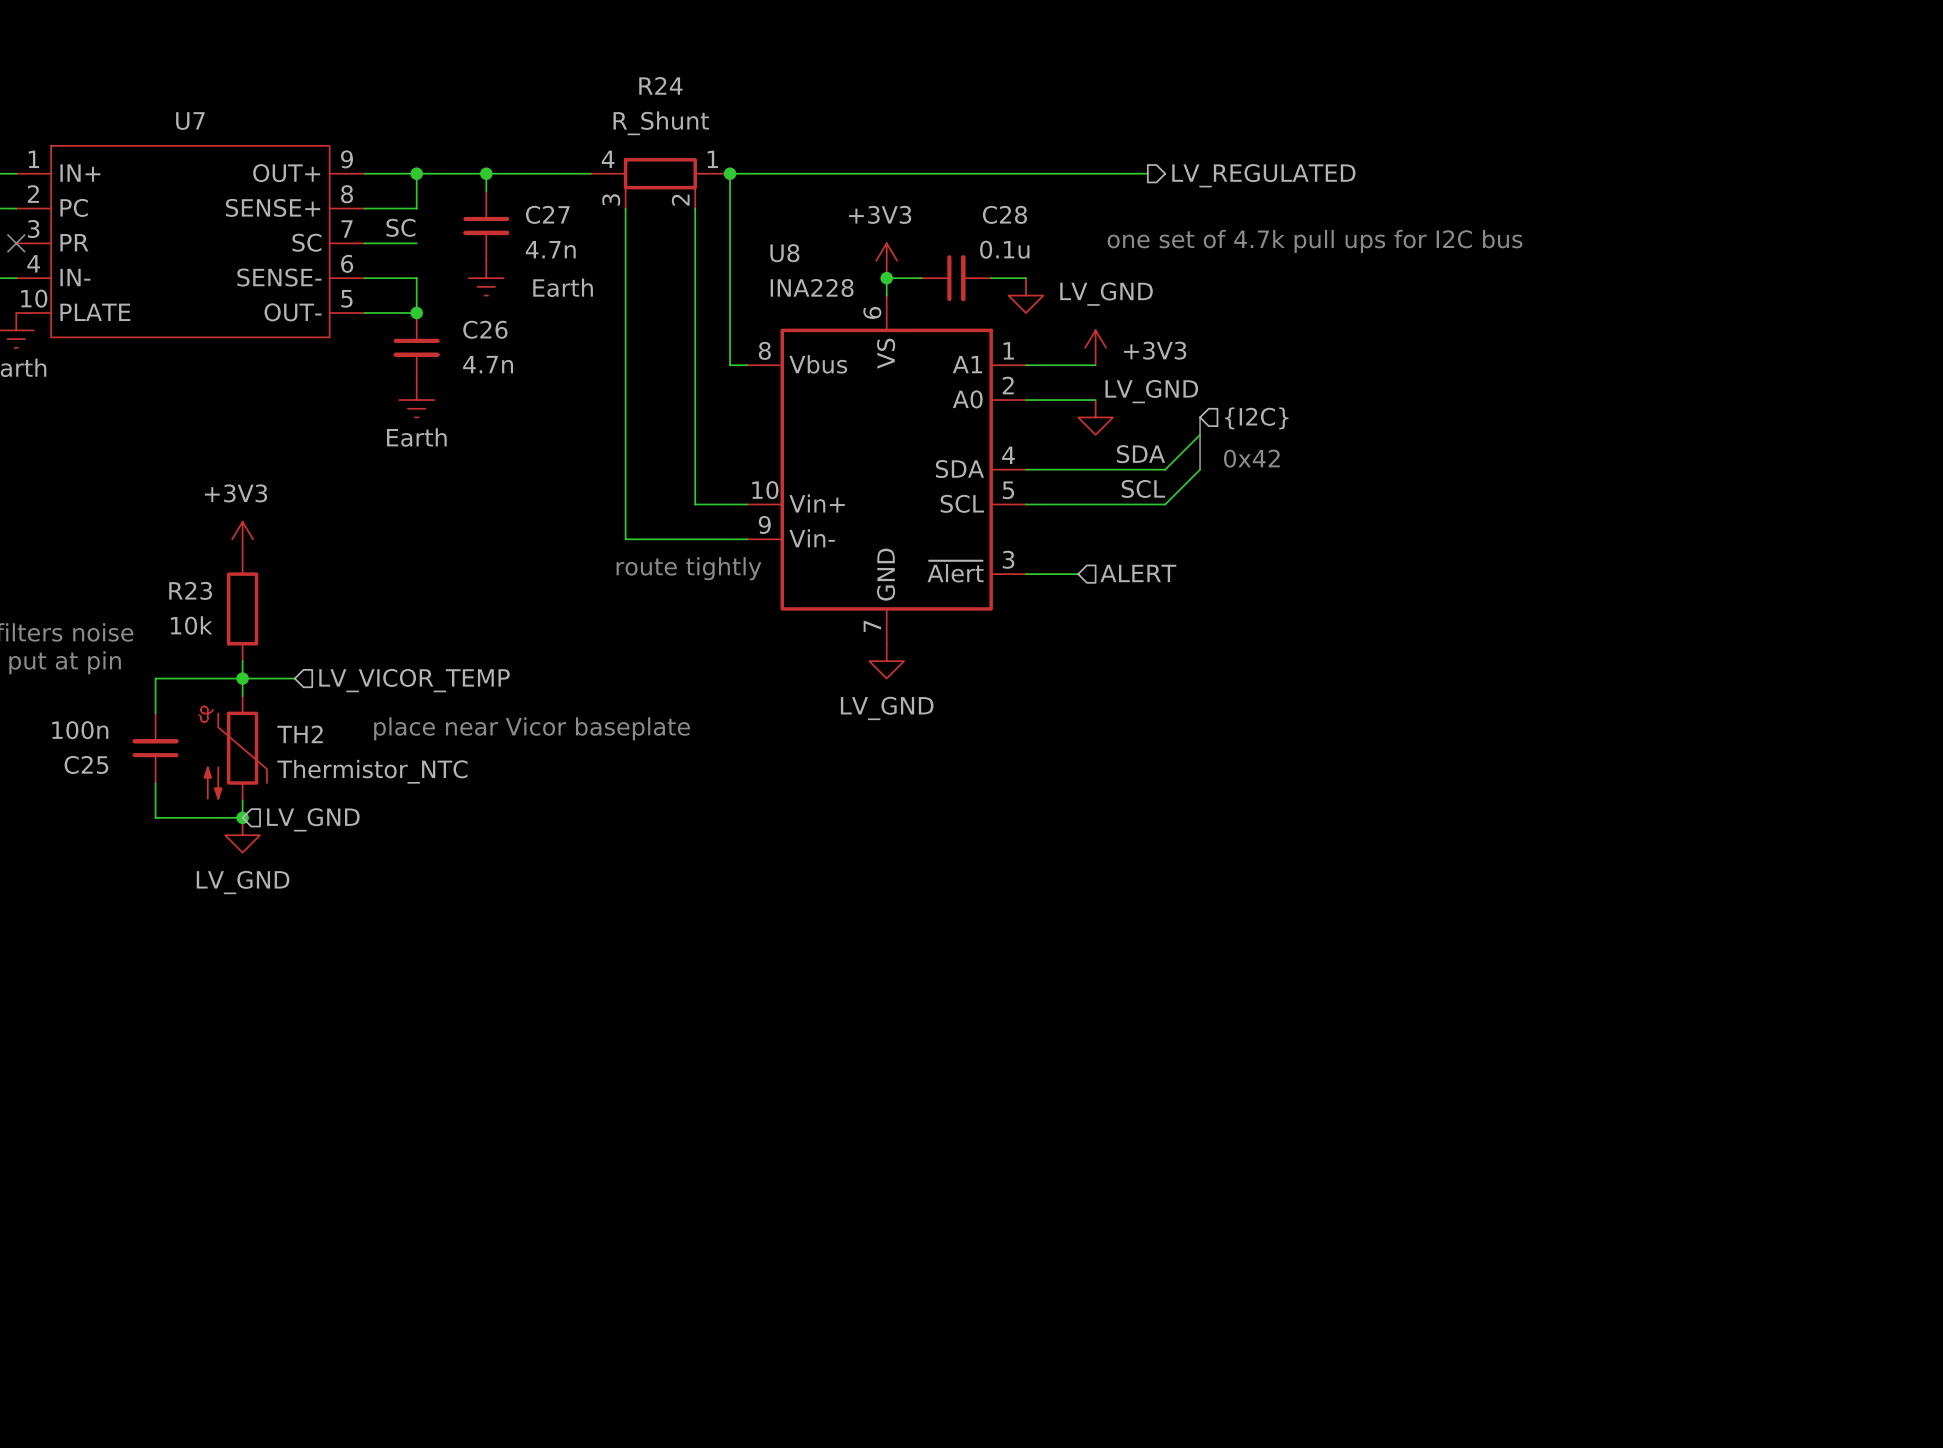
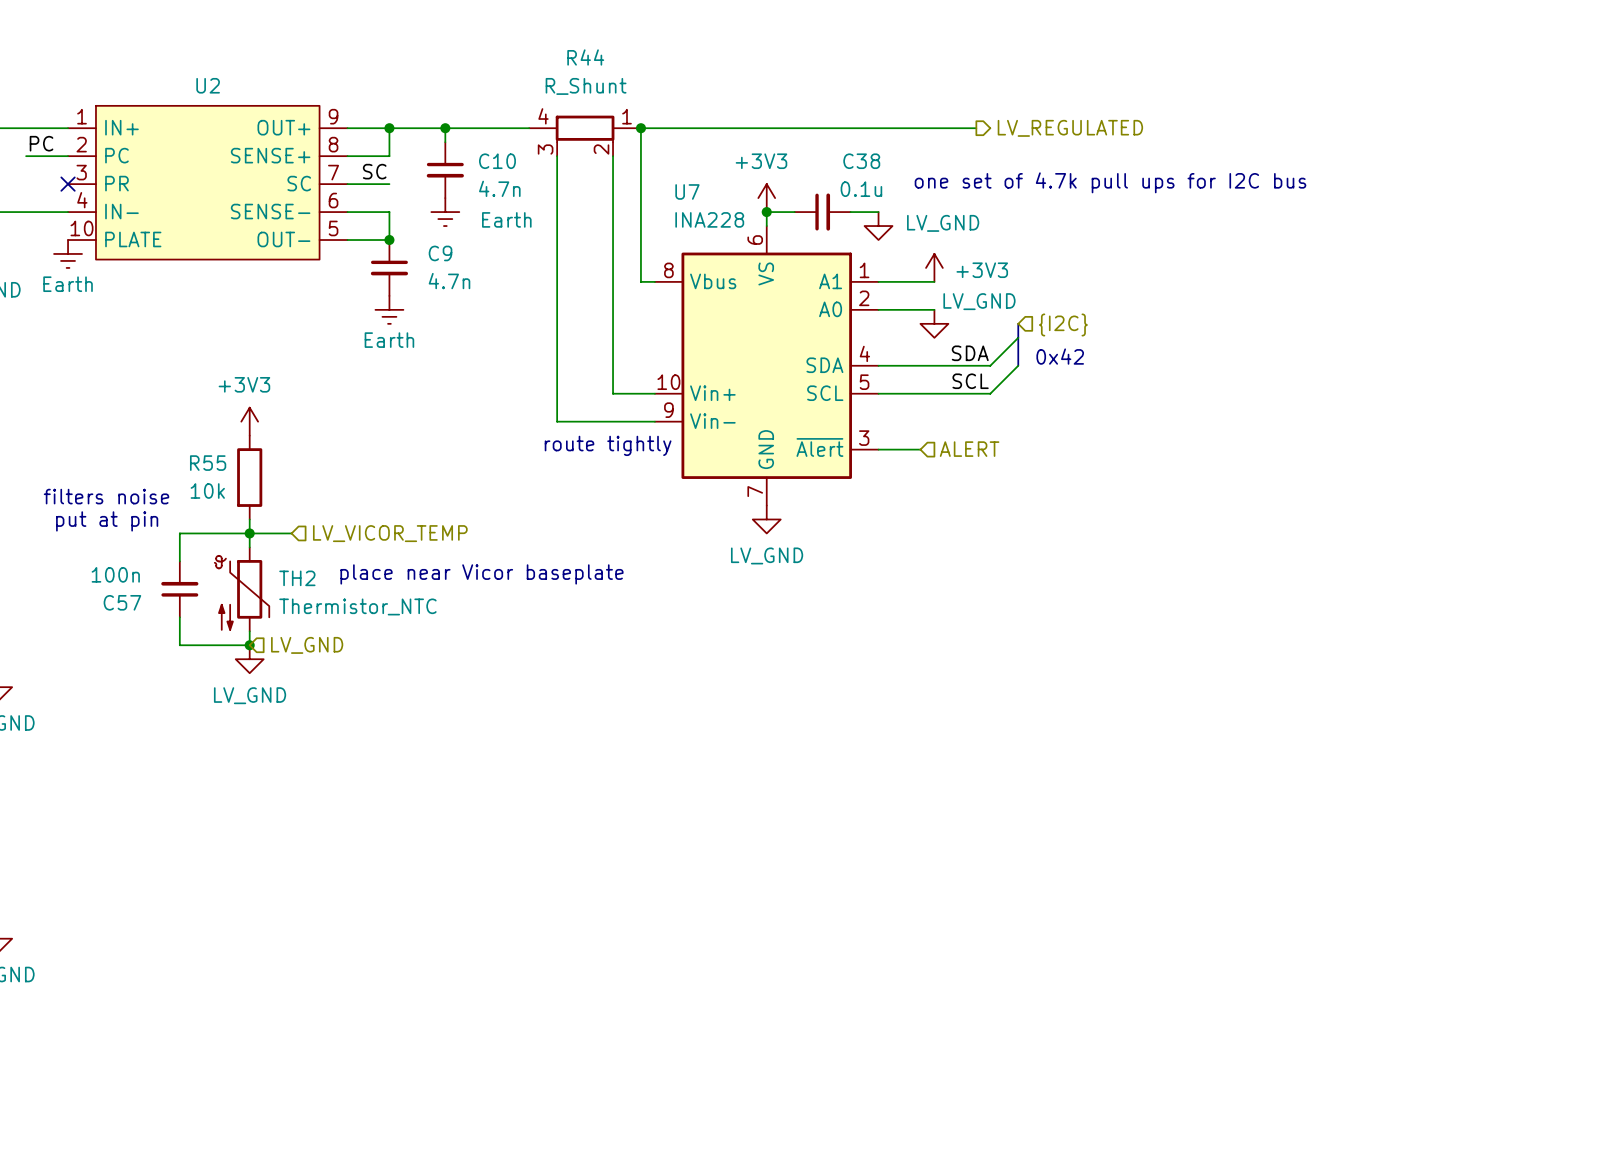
R24 name: R24 (660, 85) -> R44 (585, 57)
U7 name: U7 (190, 121) -> U2 (208, 85)
C27 name: C27 (547, 214) -> C10 (497, 161)
C28 name: C28 (1004, 214) -> C38 (861, 161)
U8 name: U8 (784, 253) -> U7 (687, 191)
C26 name: C26 (485, 329) -> C9 (440, 253)
R23 name: R23 (190, 590) -> R55 (208, 463)
C25 name: C25 (86, 764) -> C57 (122, 602)

